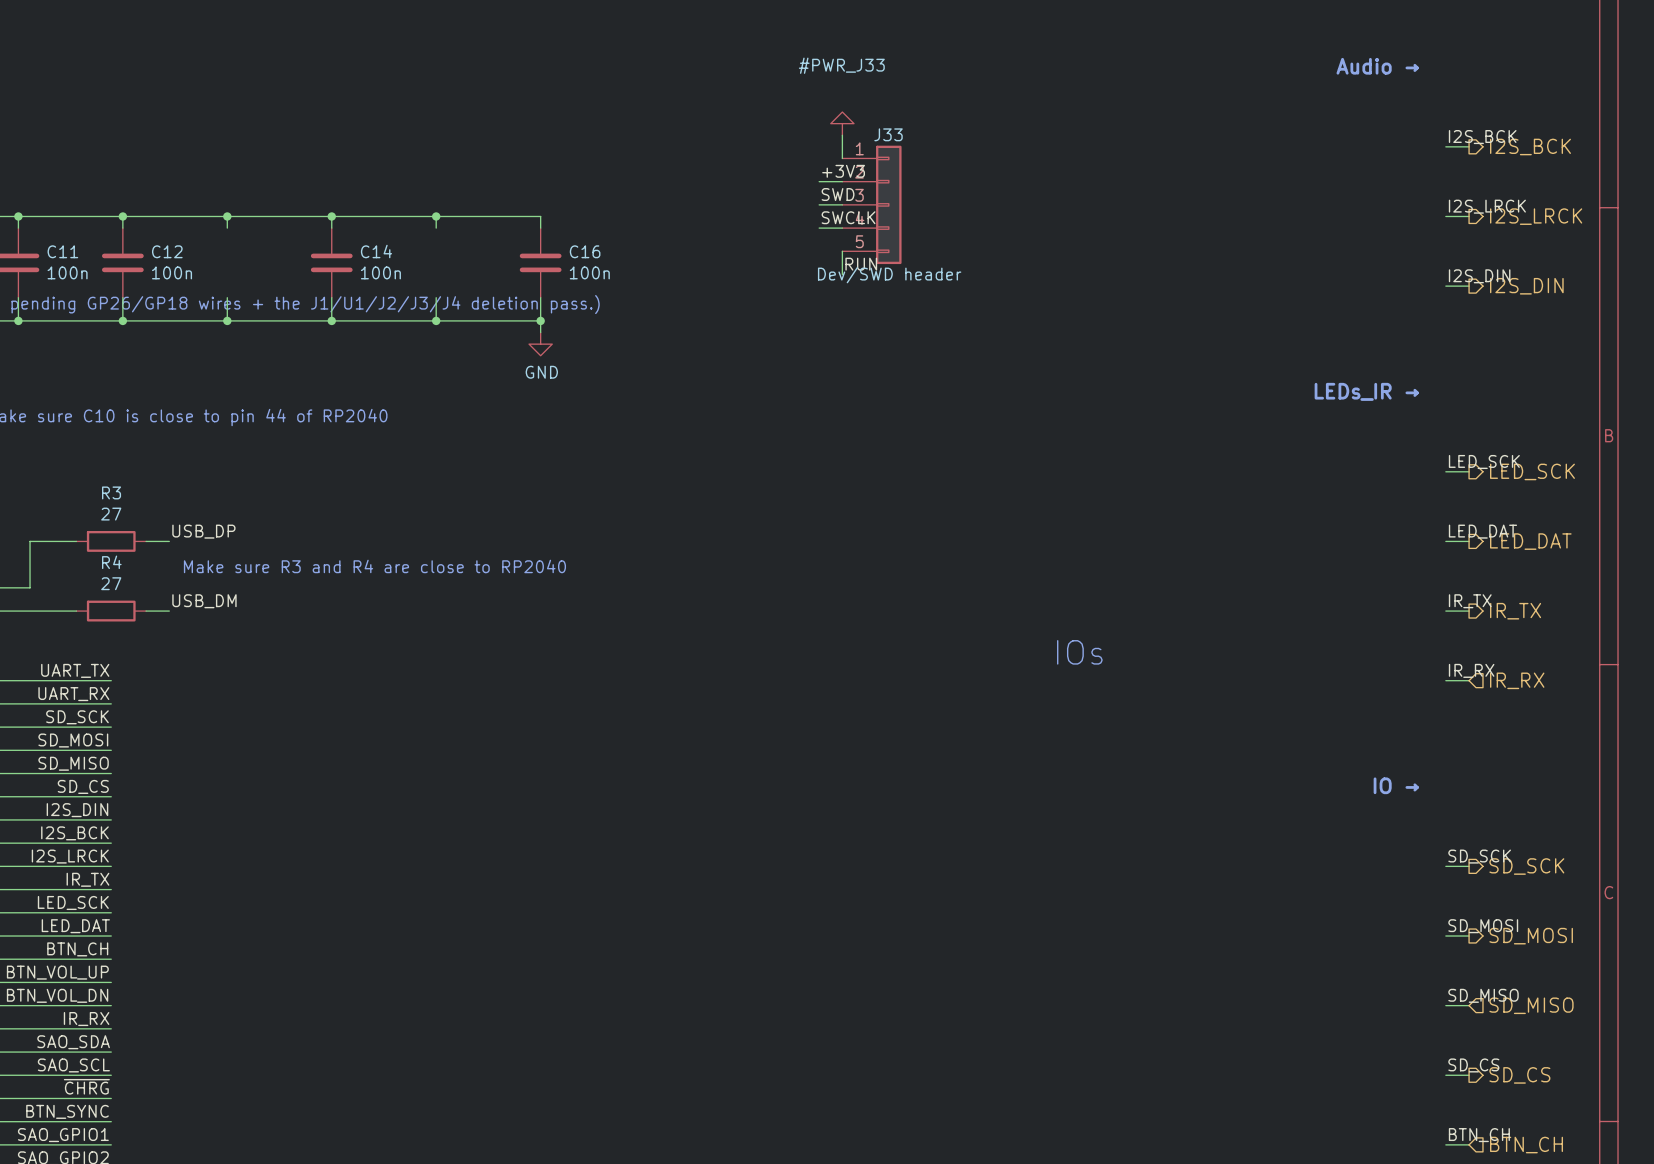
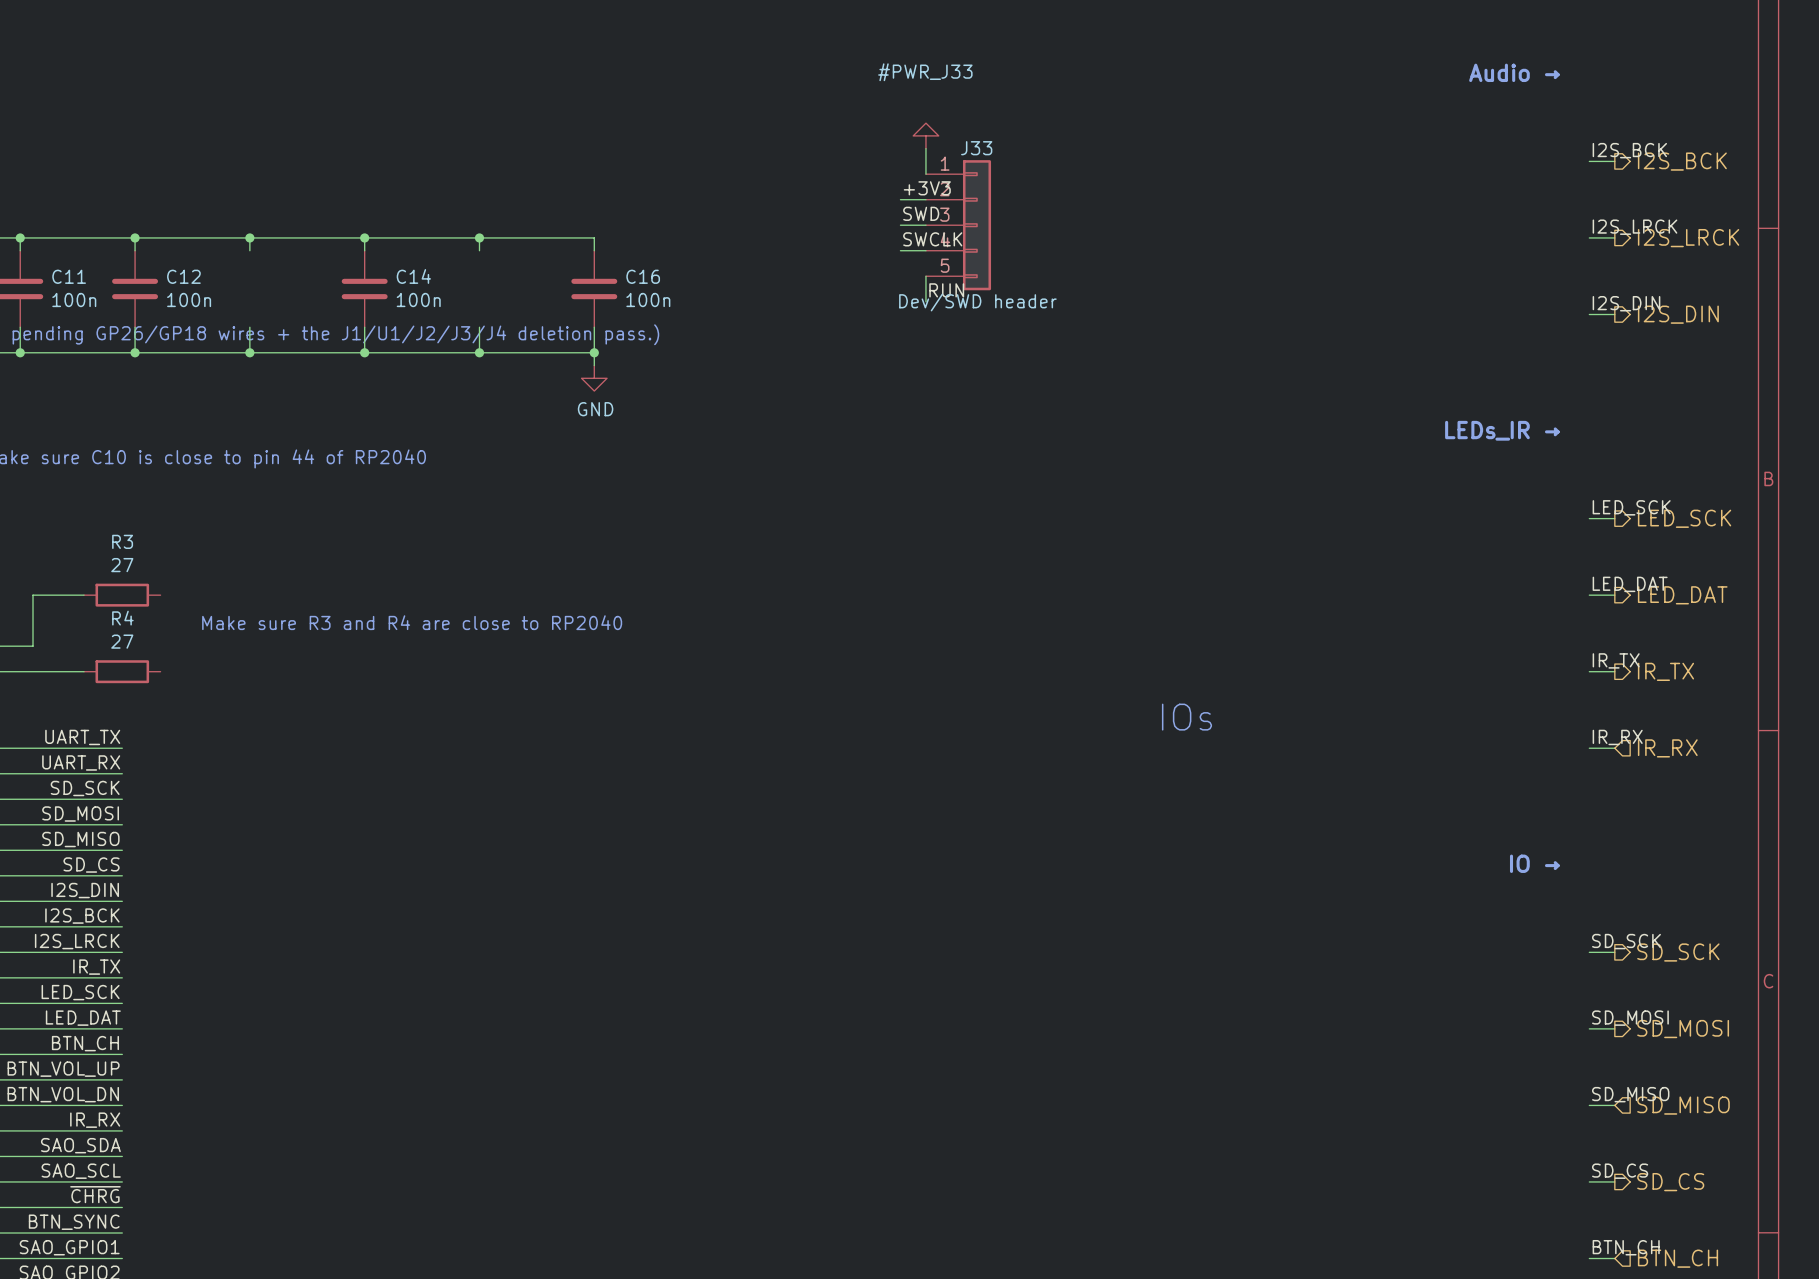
label: USB_DP (203, 531) -> none
wire: (146, 541) (169, 541) -> none
label: USB_DM (204, 601) -> none
wire: (146, 611) (169, 611) -> none

